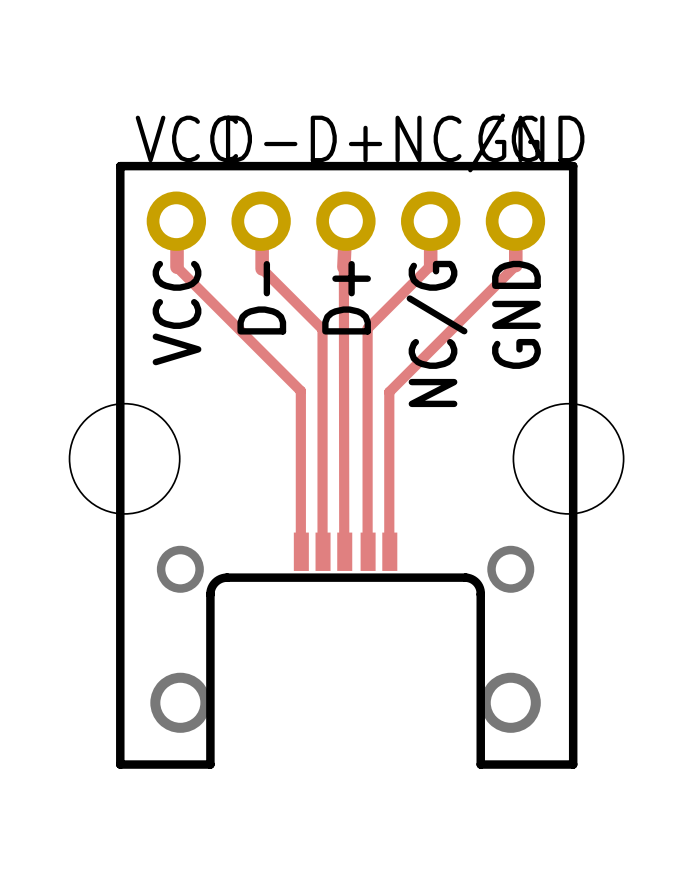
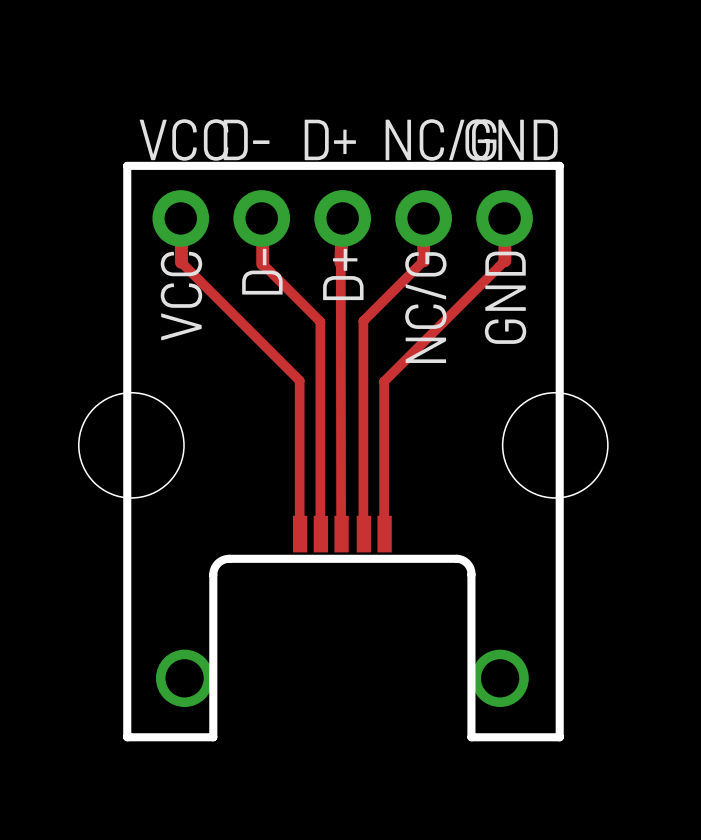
via: (180, 569) -> none
via: (510, 569) -> none

